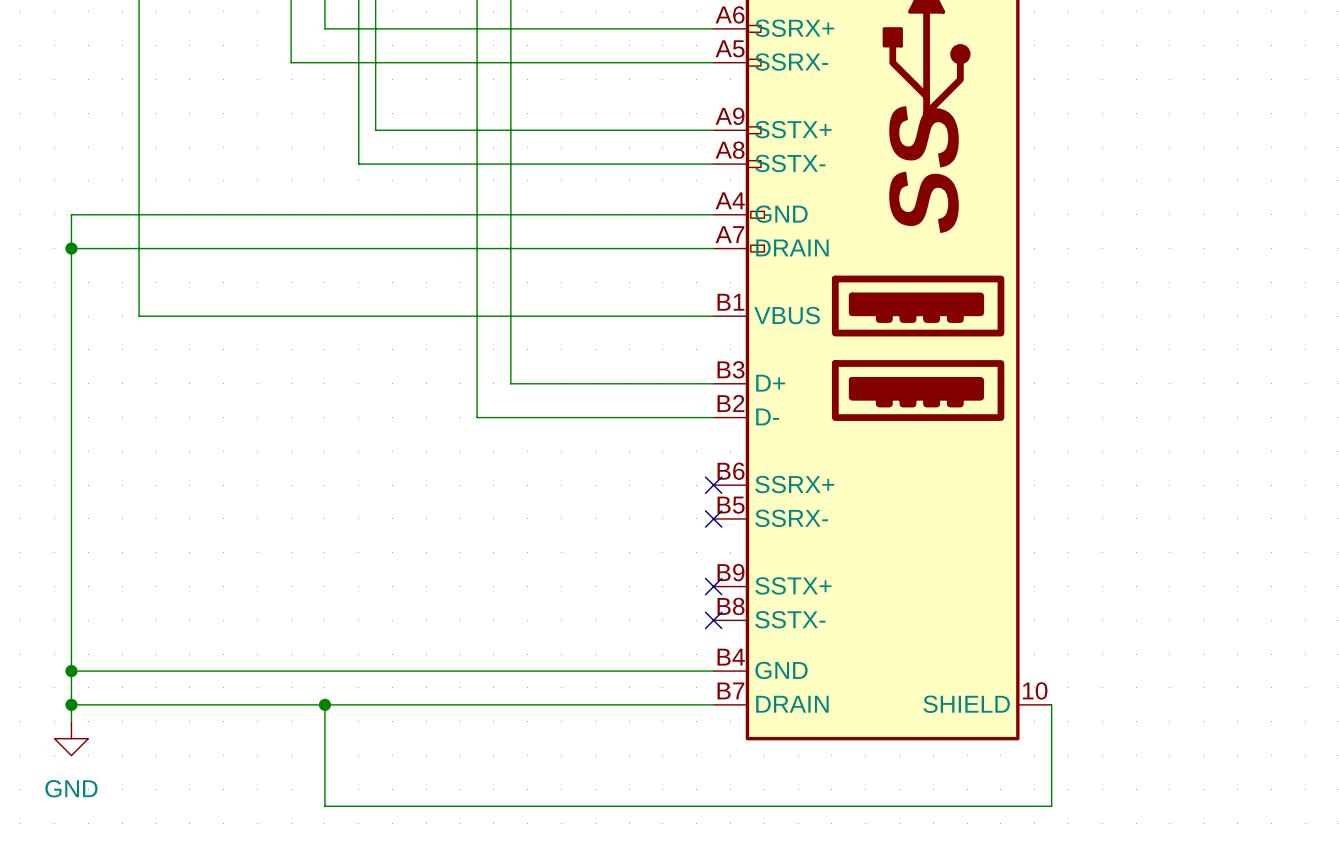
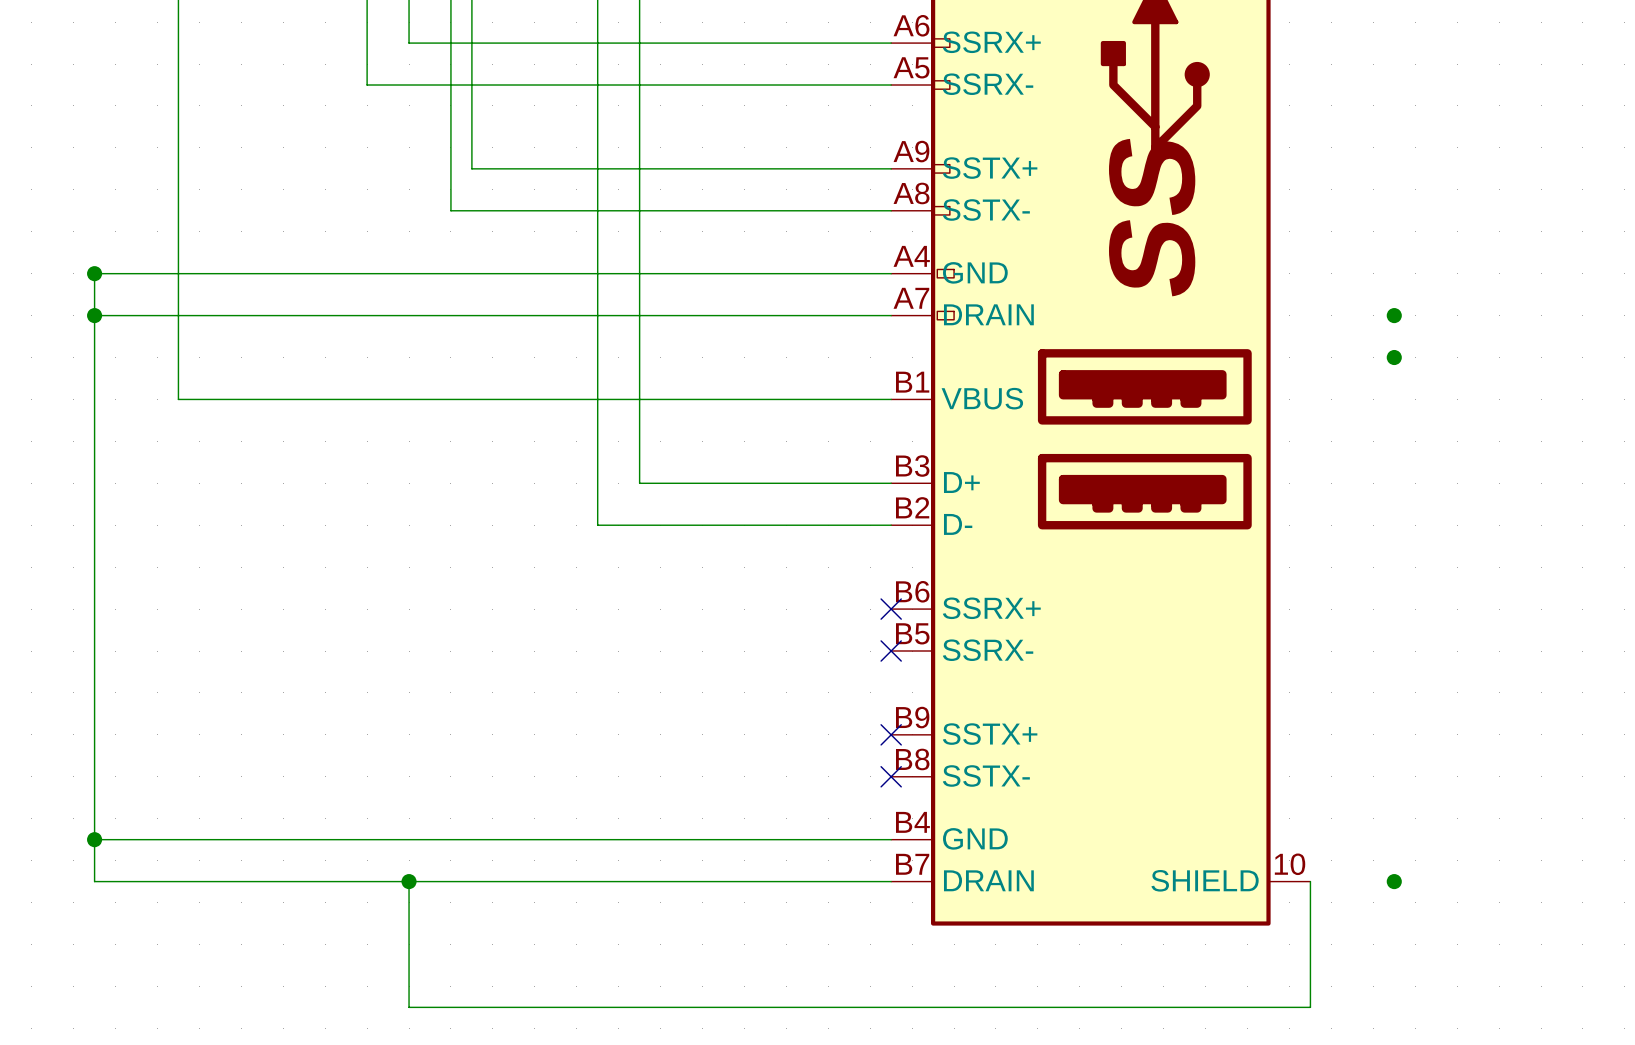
junction: none -> (94, 273)
junction: none -> (1394, 315)
junction: none -> (1394, 357)
wire: (71, 704) (71, 721) -> none
junction: (71, 704) -> none
junction: none -> (1394, 881)
power symbol: GND (71, 738) -> none

